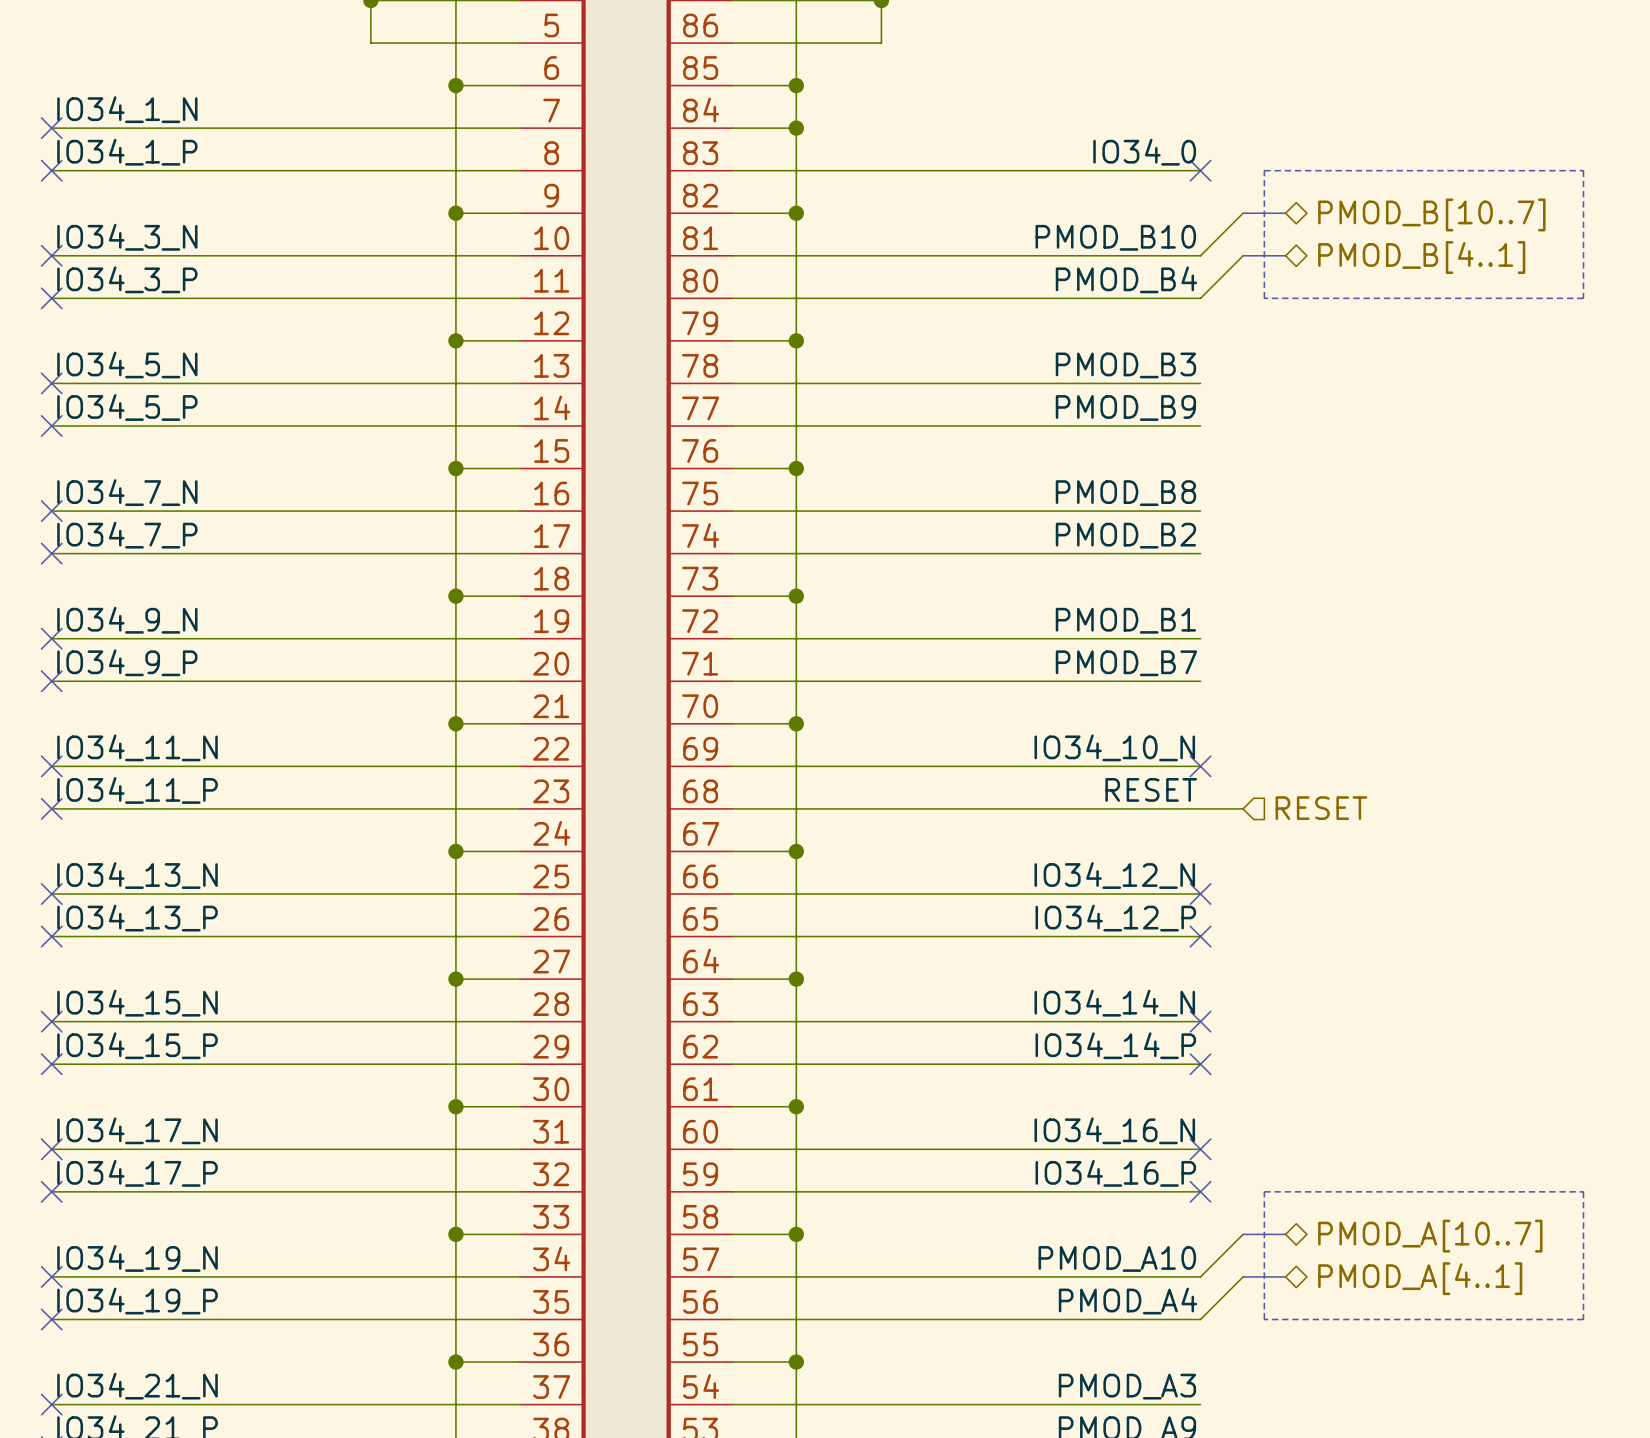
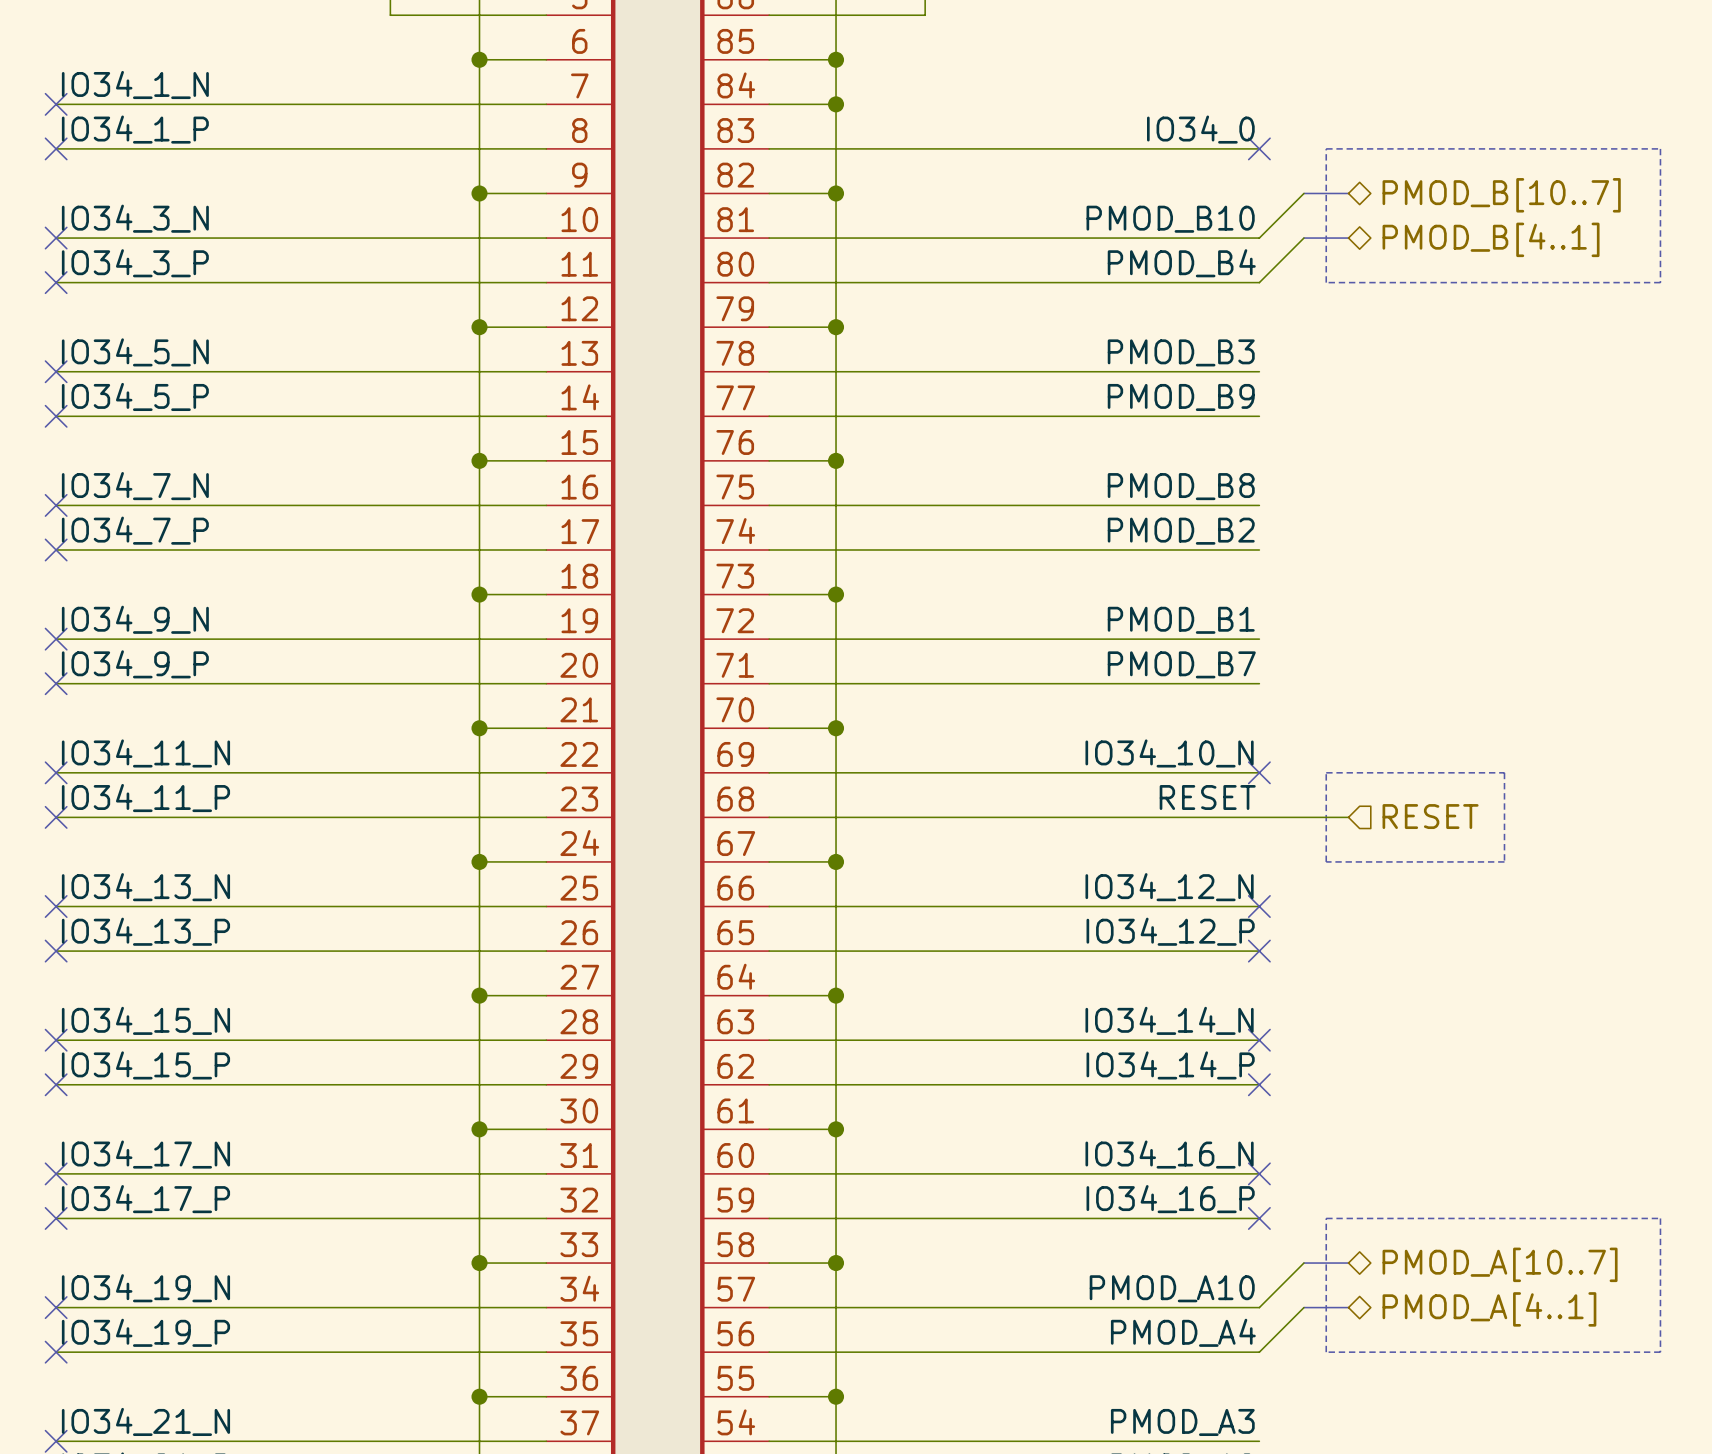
line: none -> (1326, 772) (1504, 772) (1504, 861) (1326, 861) (1326, 772)
wire: none -> (1303, 817) (1348, 817)
hierarchical label position: RESET (1321, 808) -> RESET (1430, 816)

